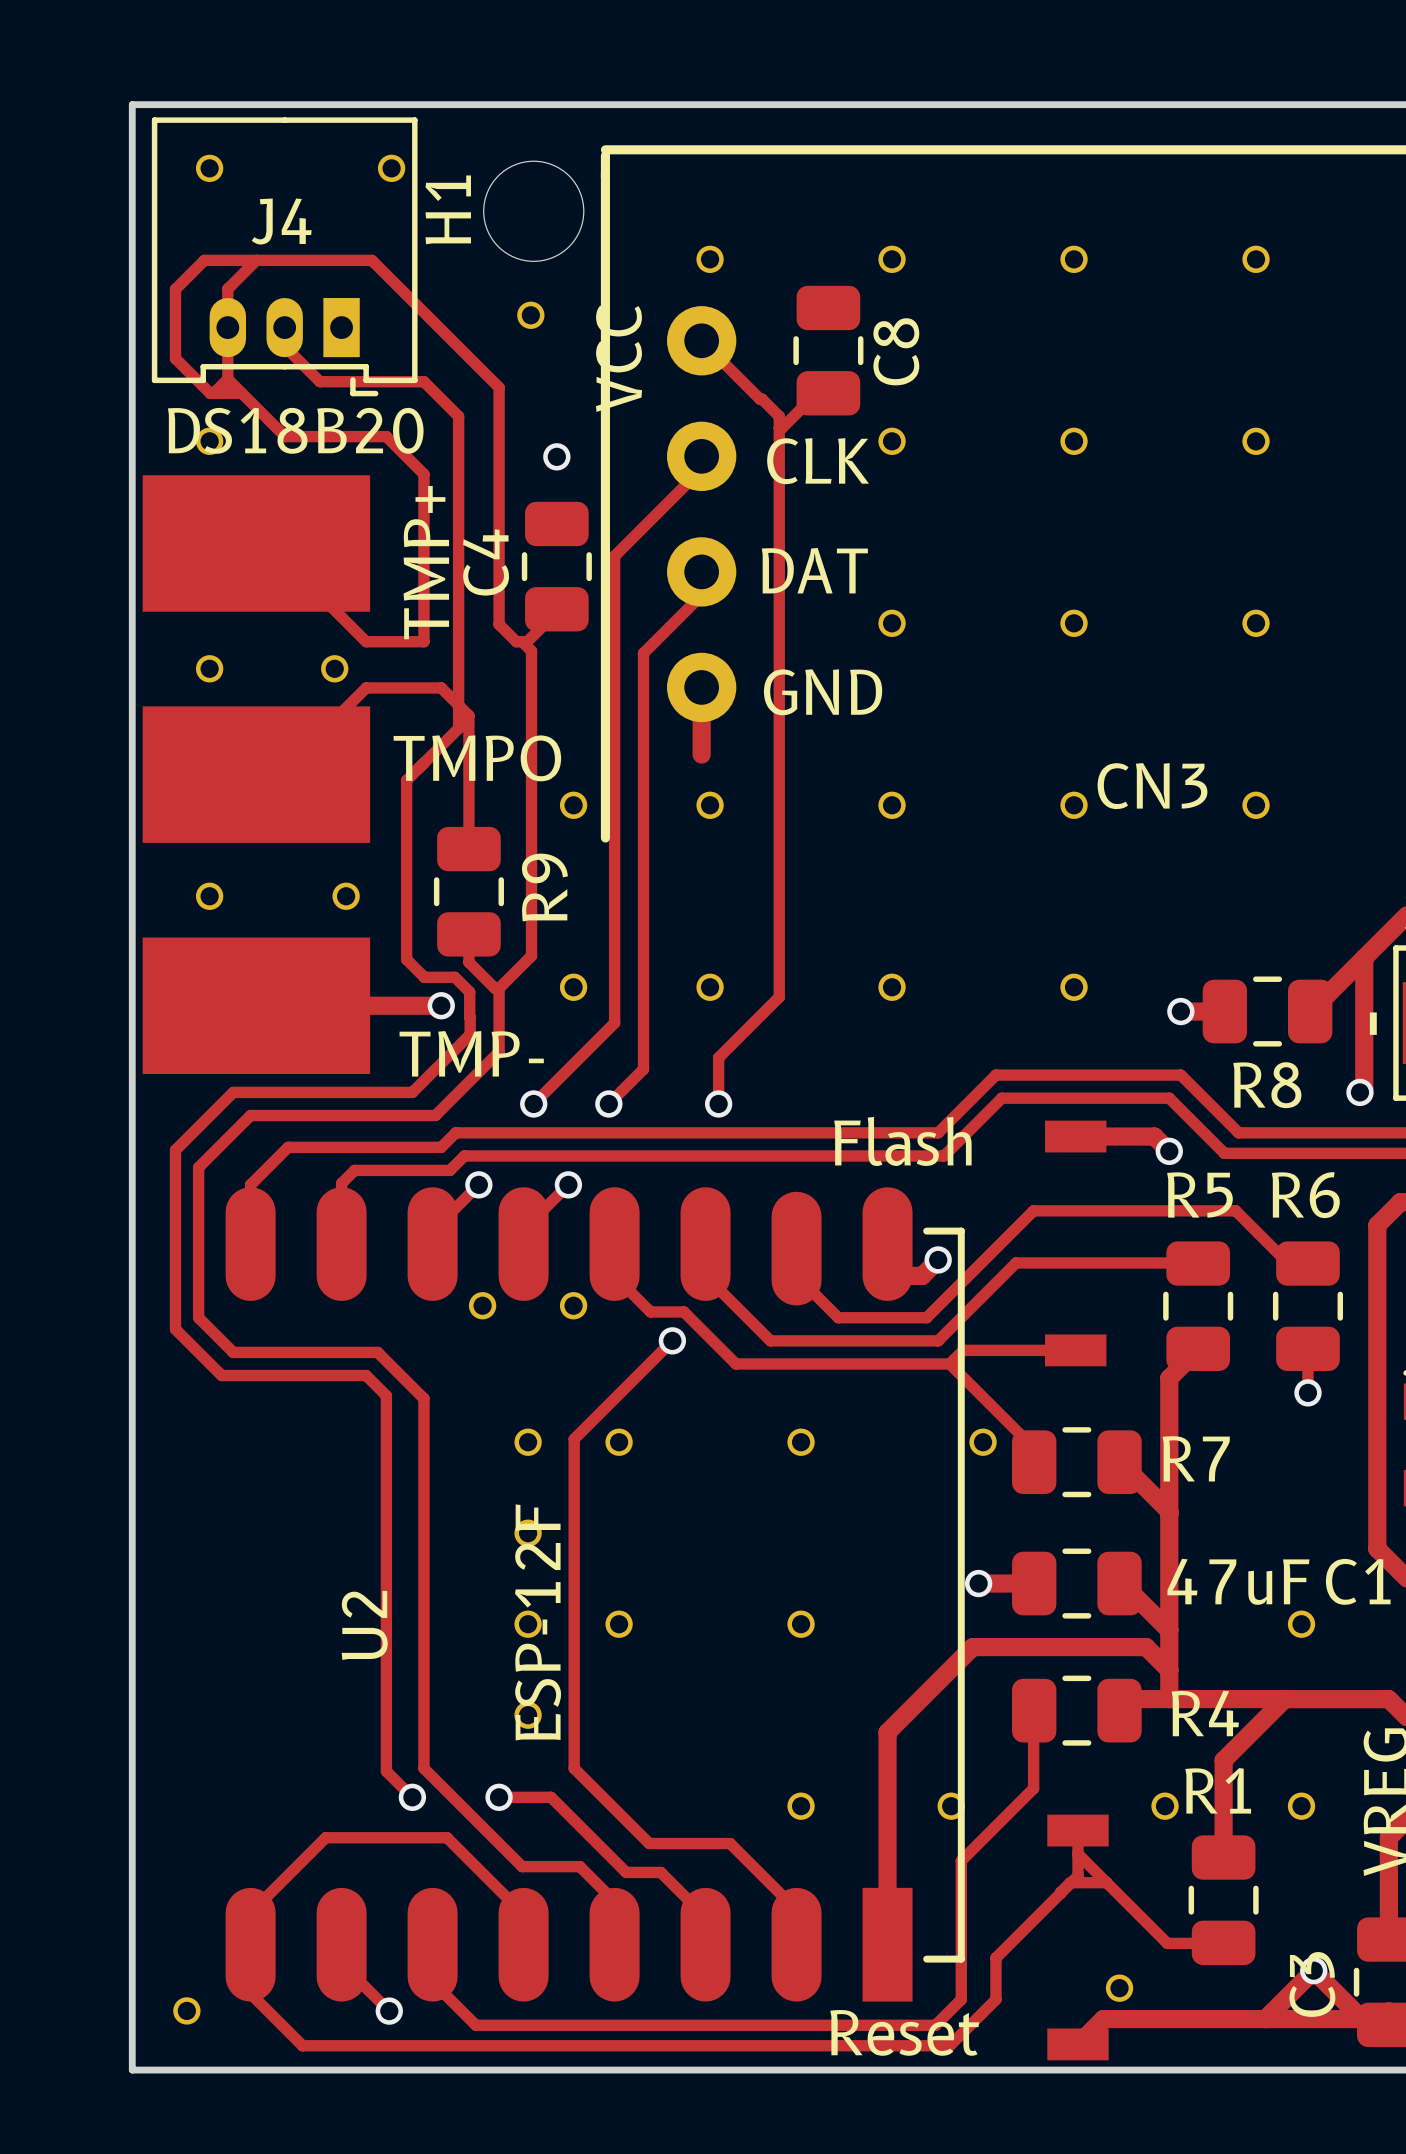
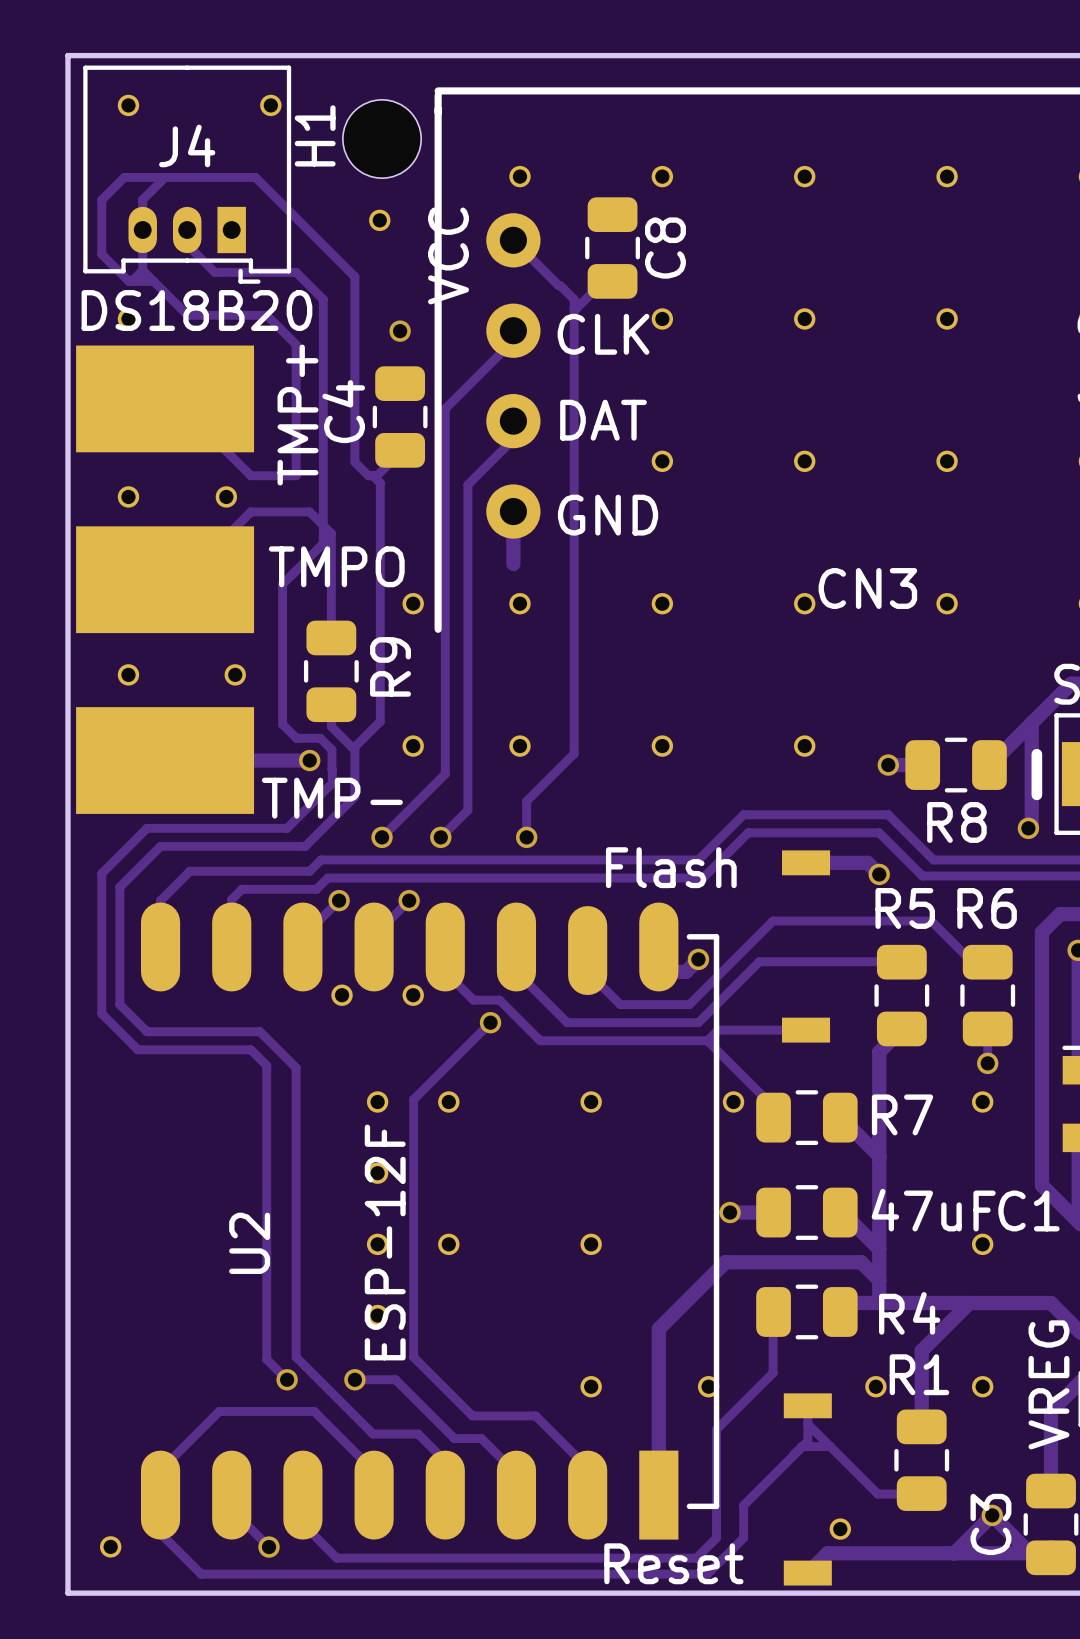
part: none -> (982, 1101)

